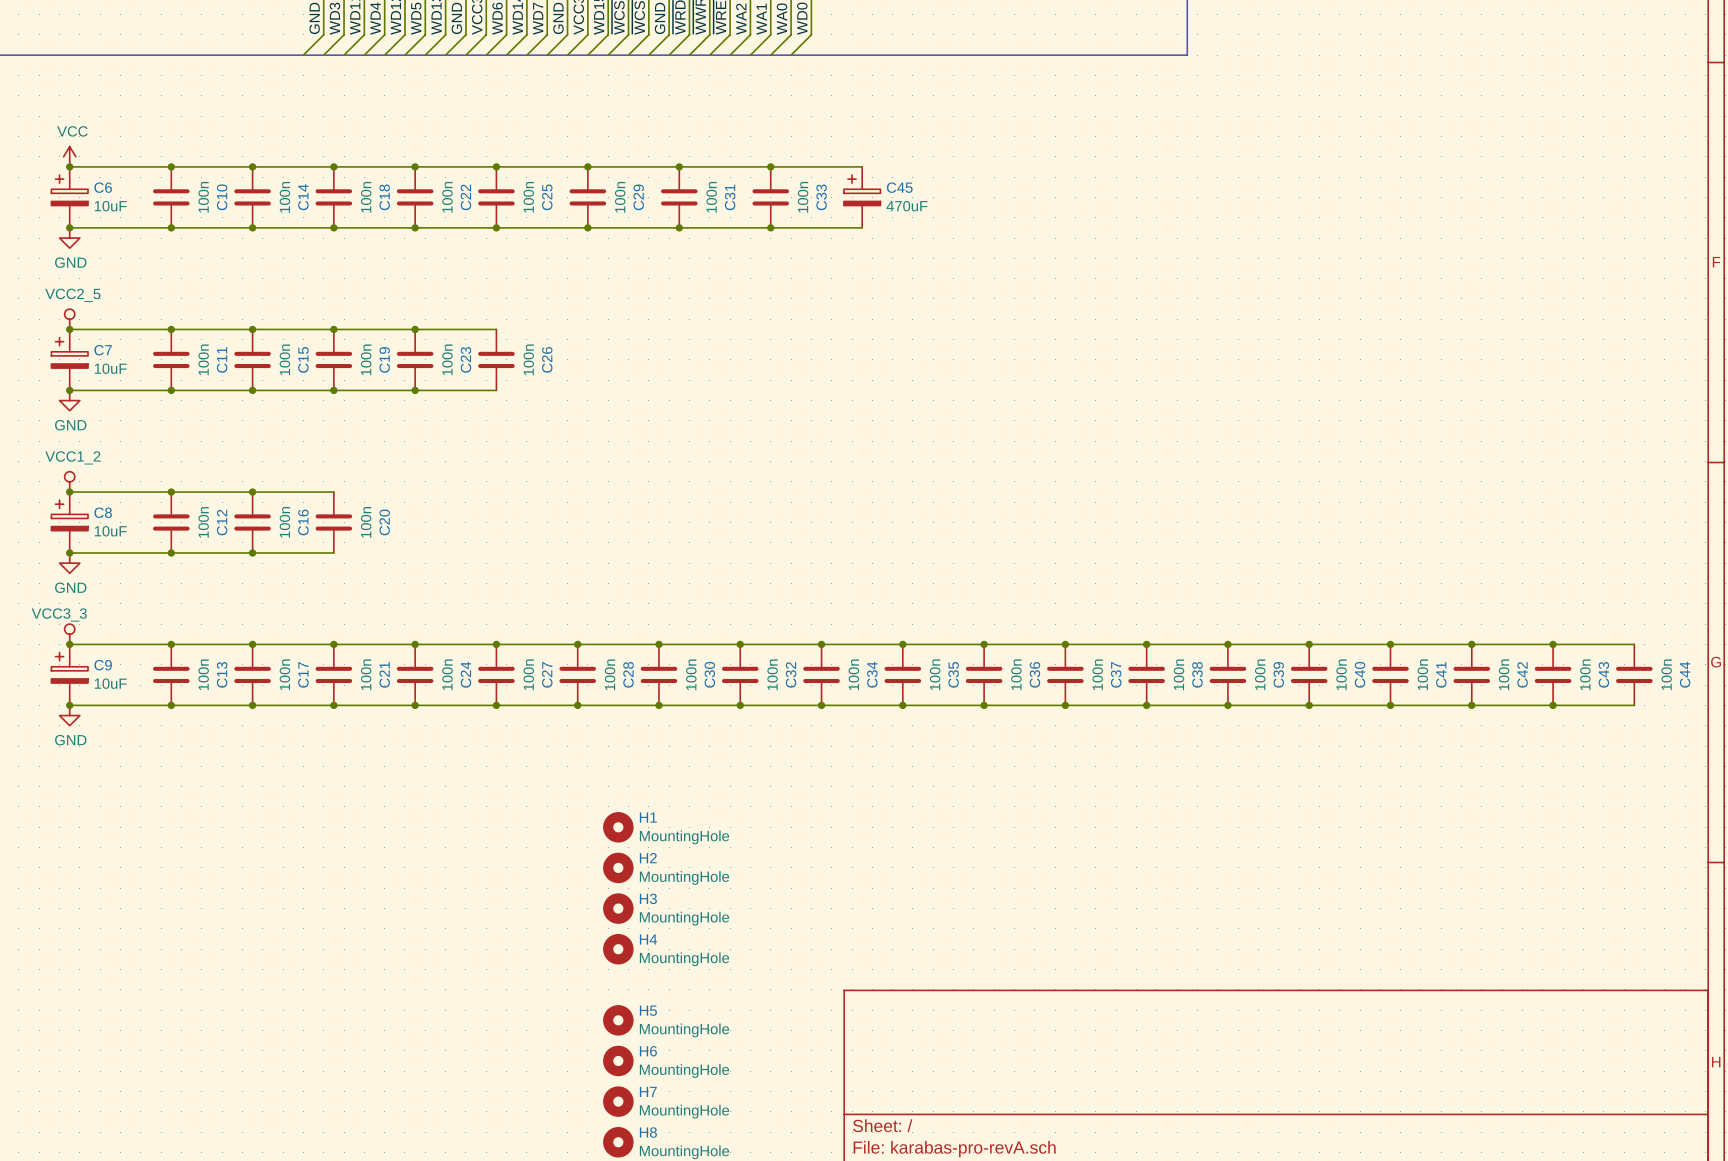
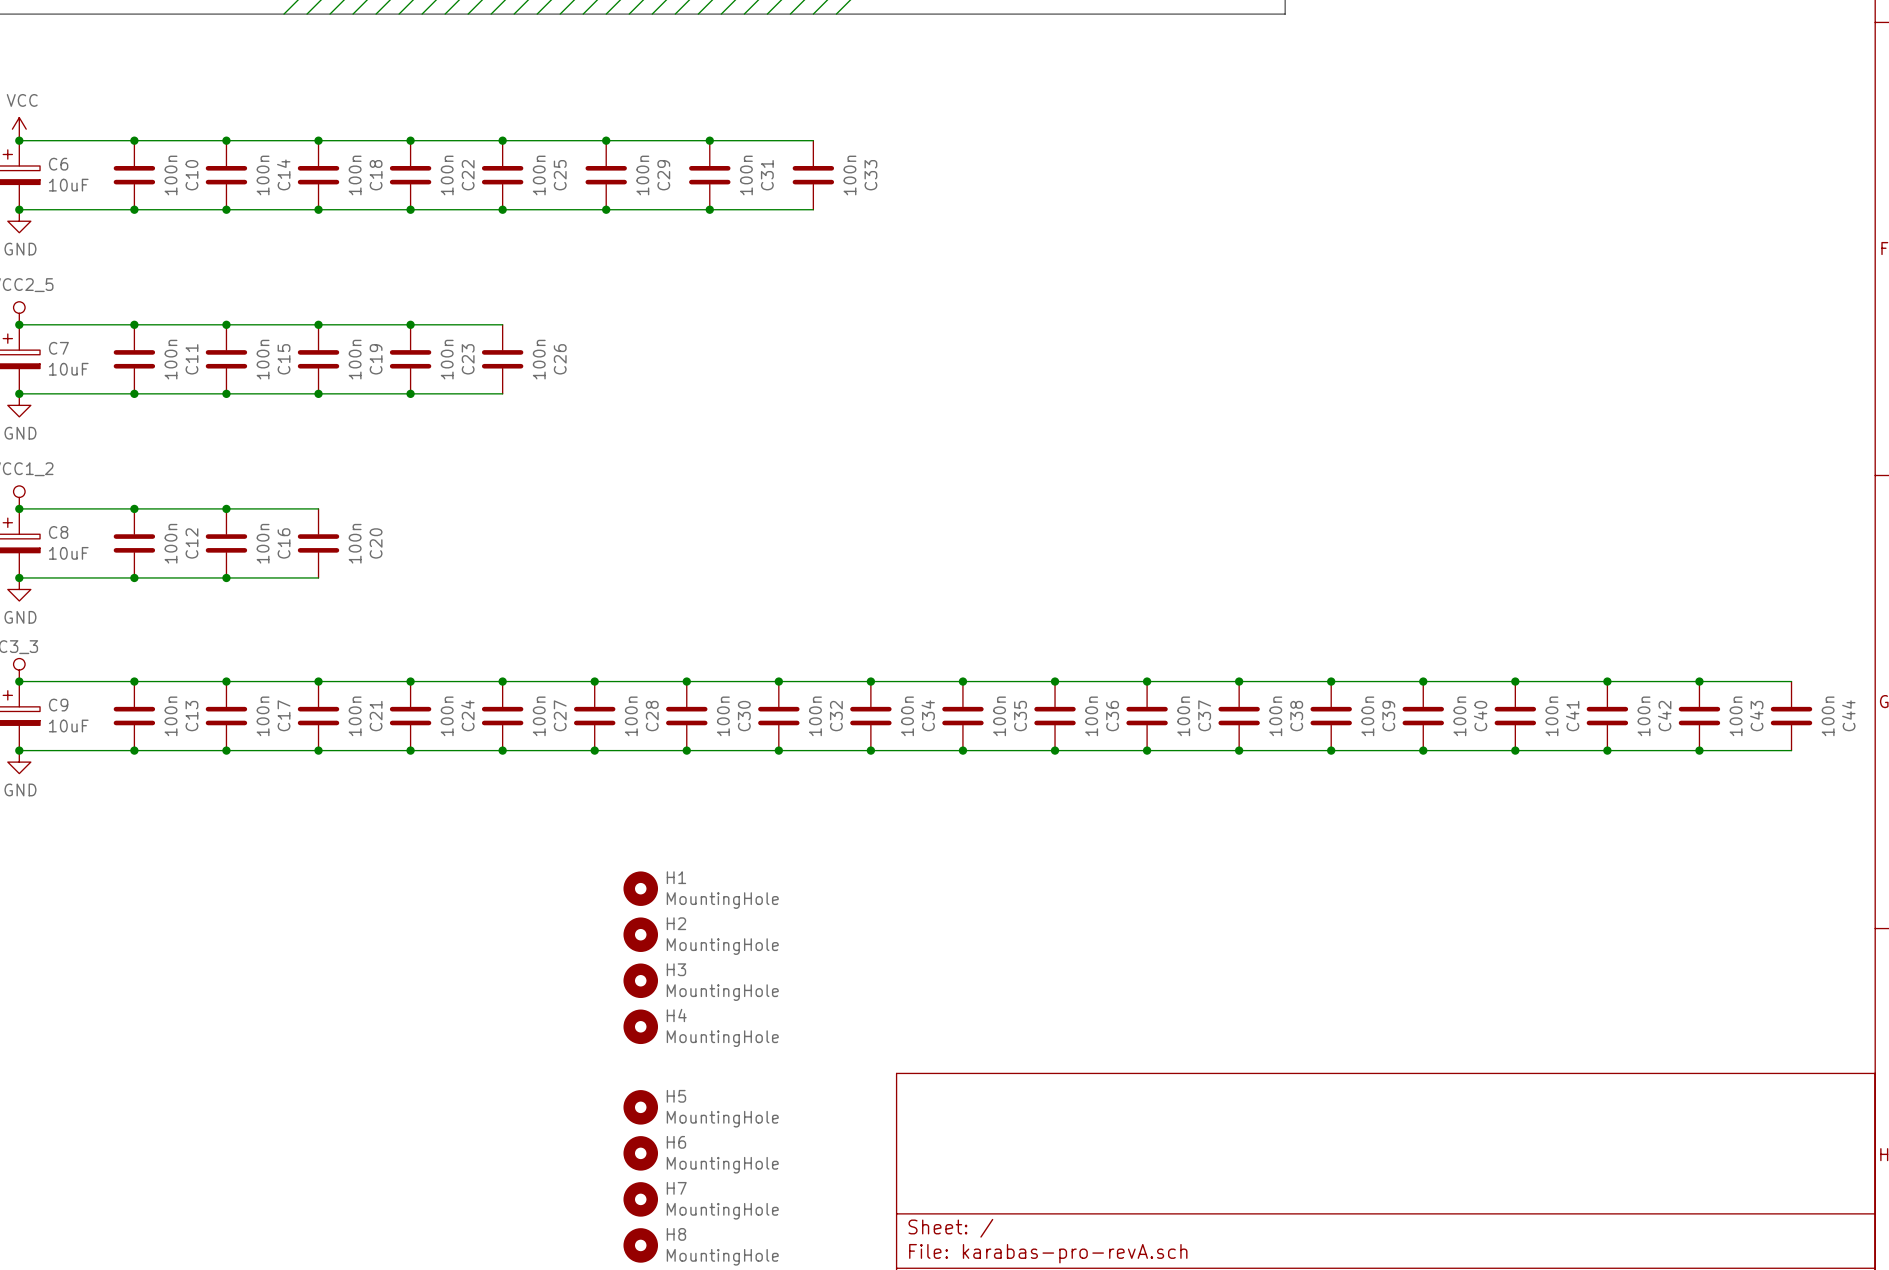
wire: (770, 166) (862, 166) -> none
junction: (770, 166) -> none
C45: 470uF (862, 197) -> none
wire: (770, 227) (862, 227) -> none
junction: (770, 227) -> none

